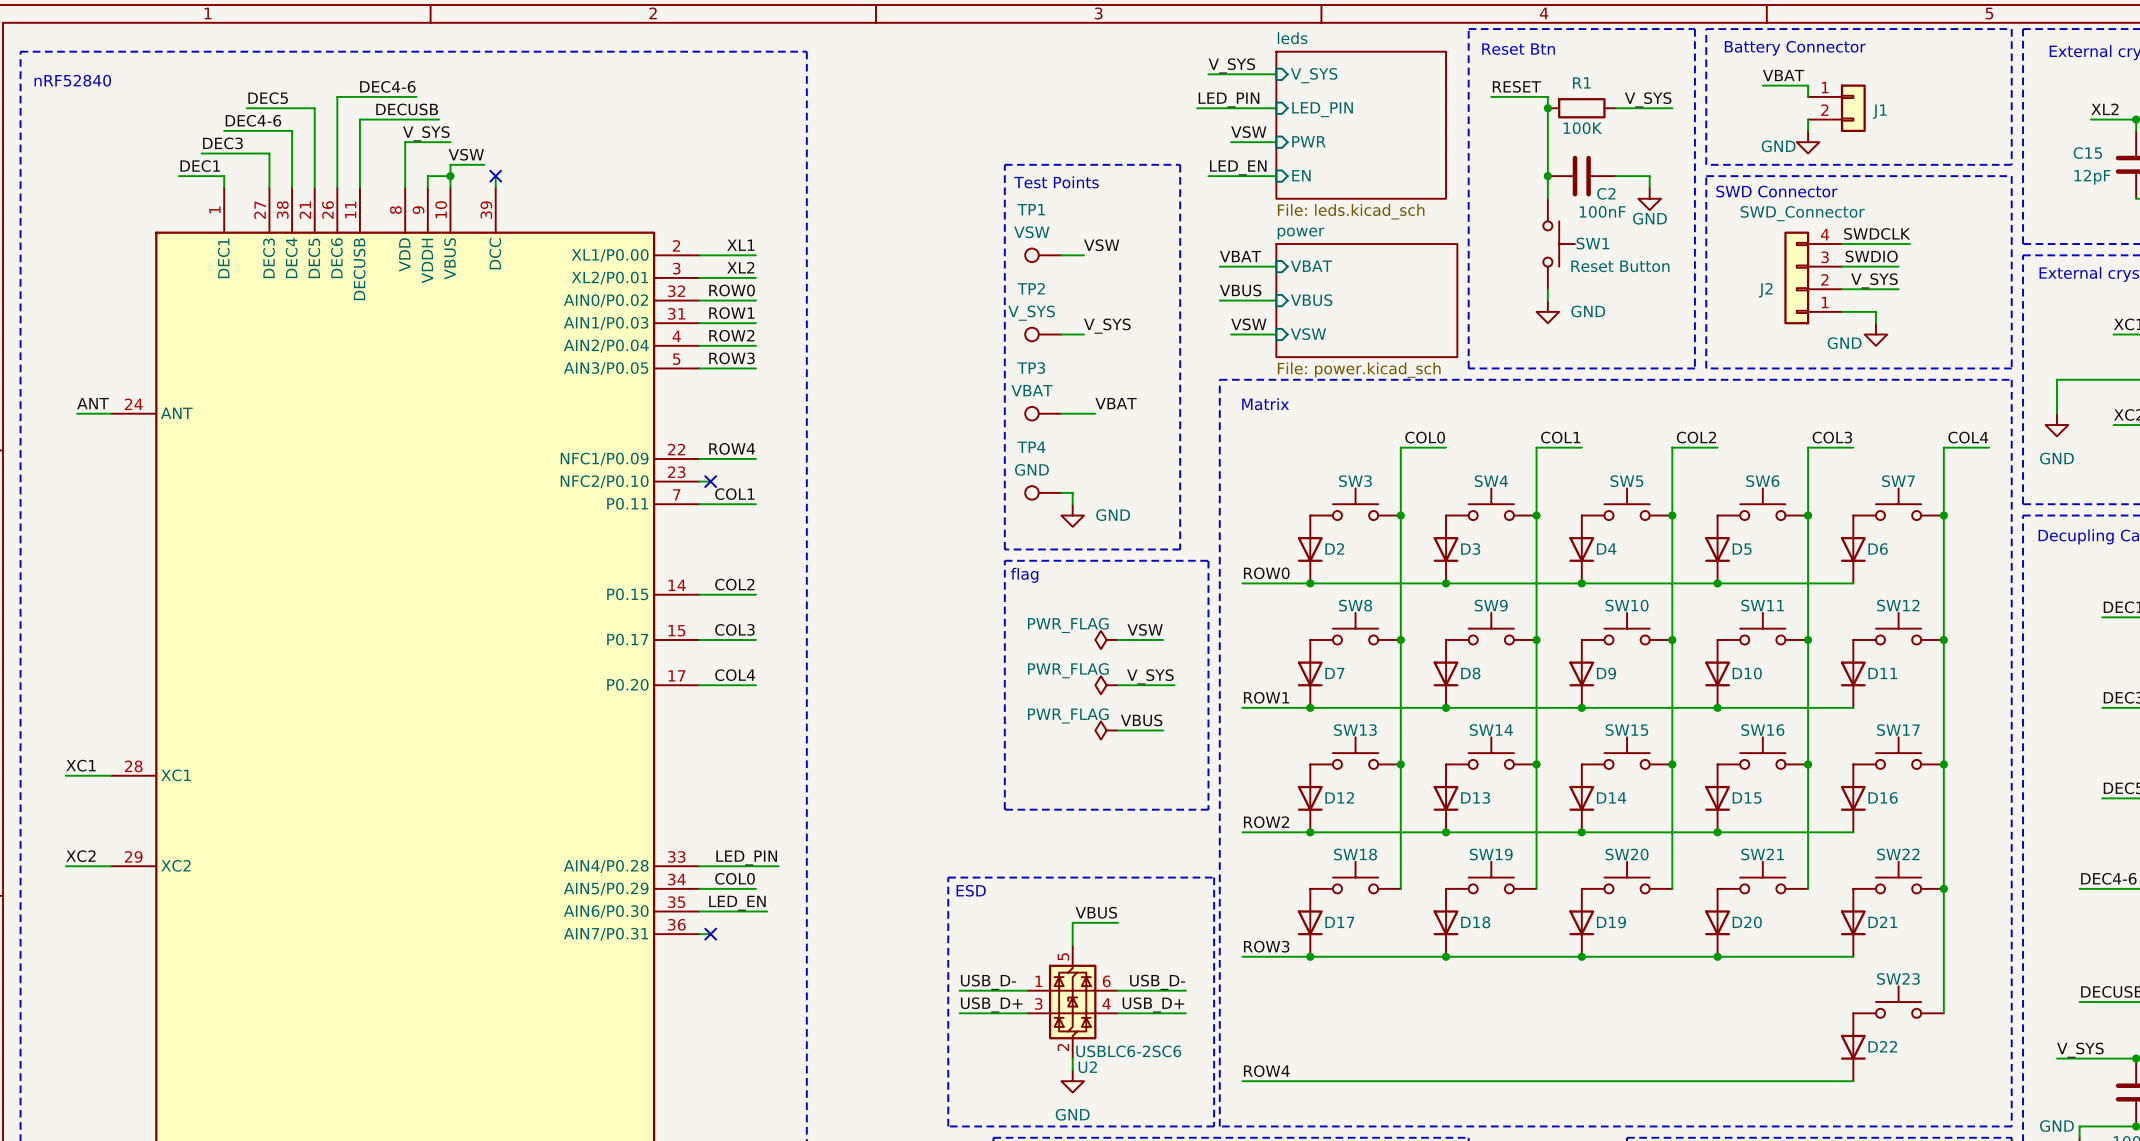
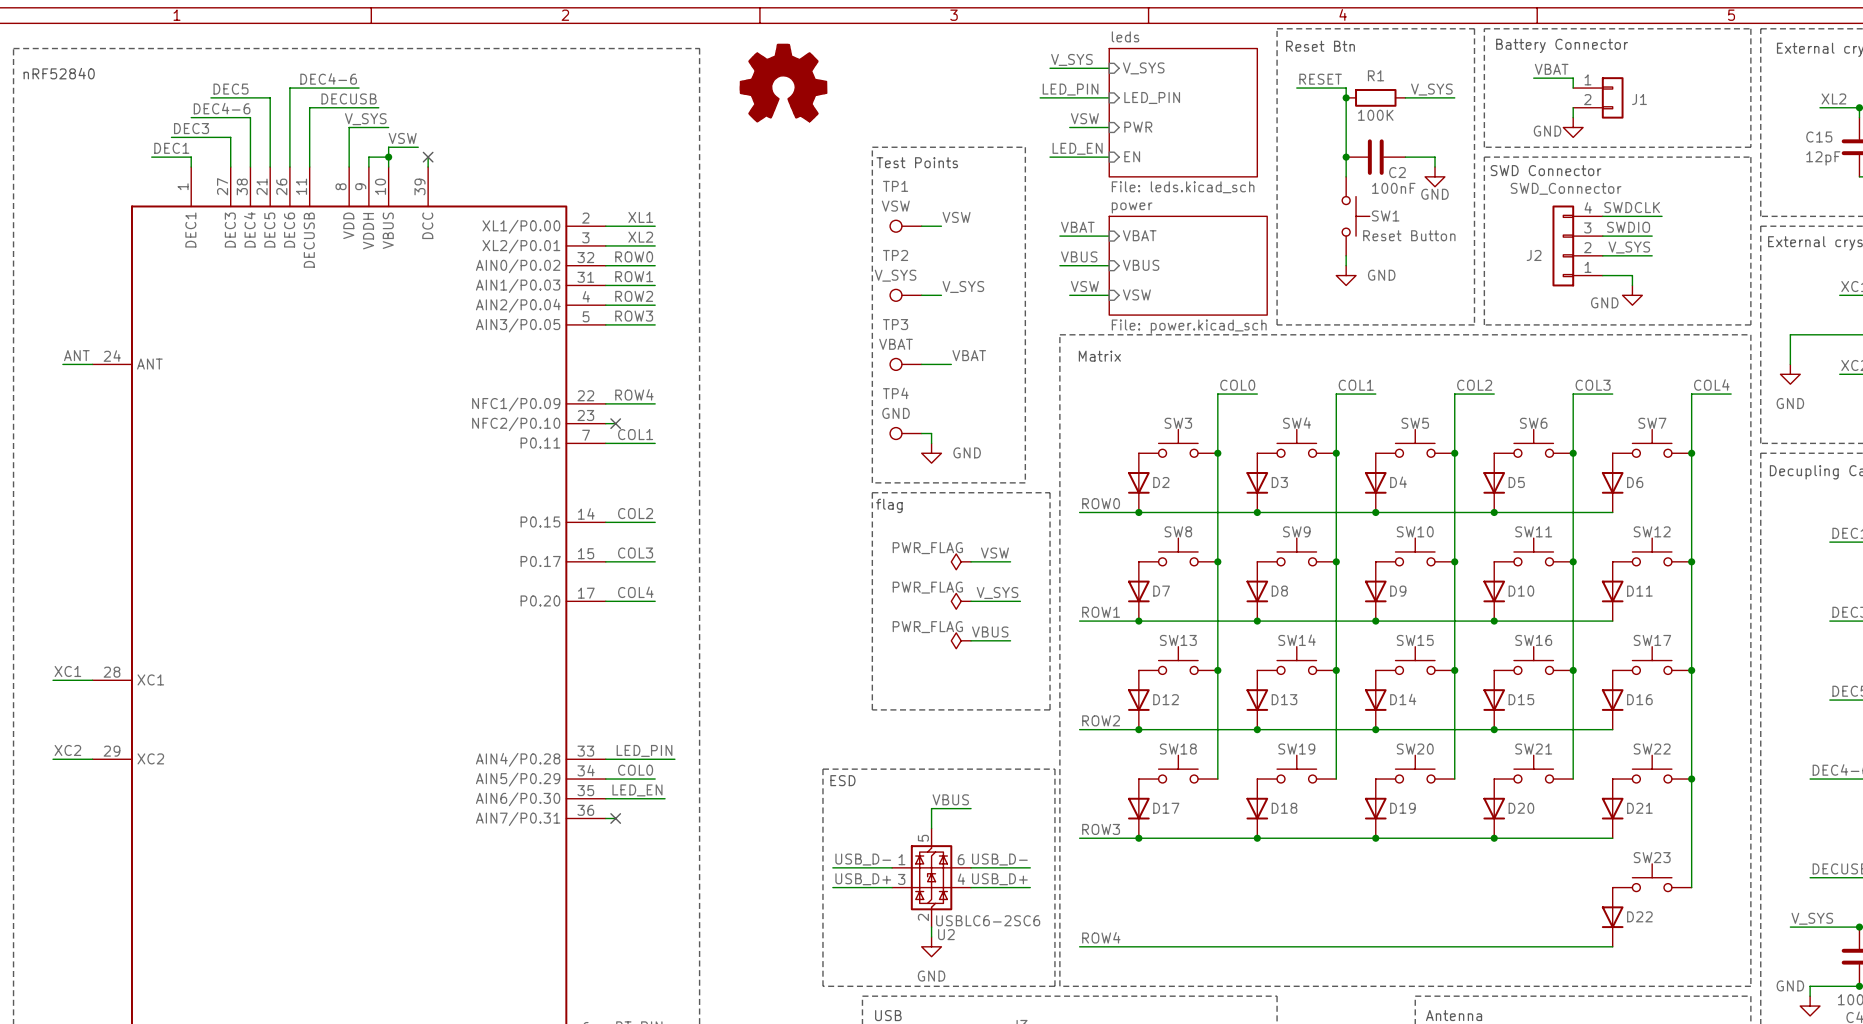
part: none -> (783, 83)

